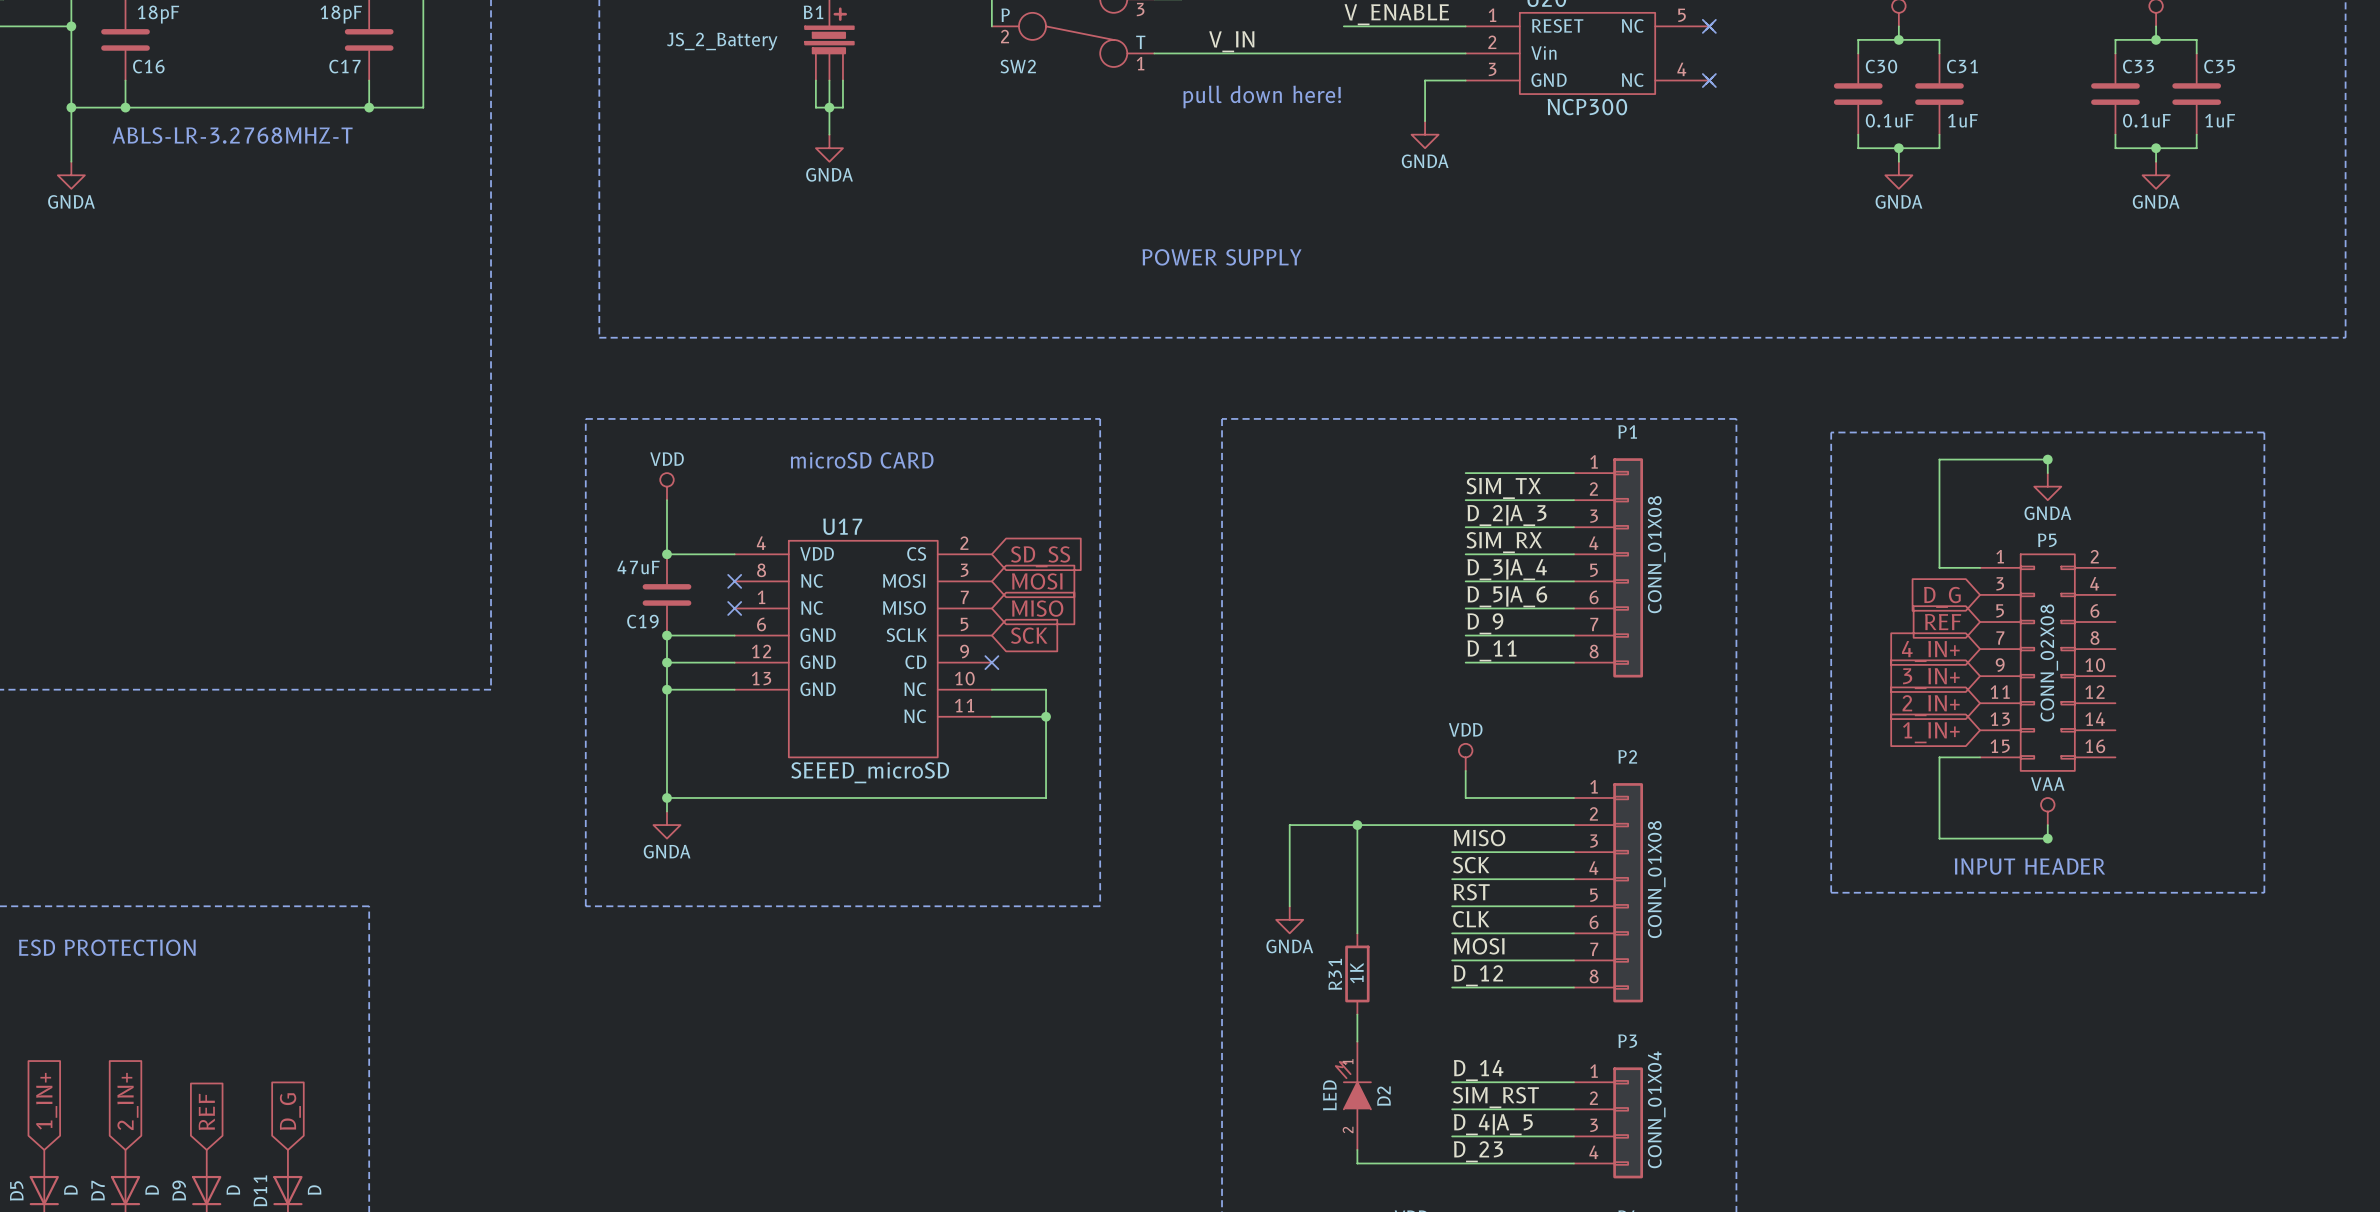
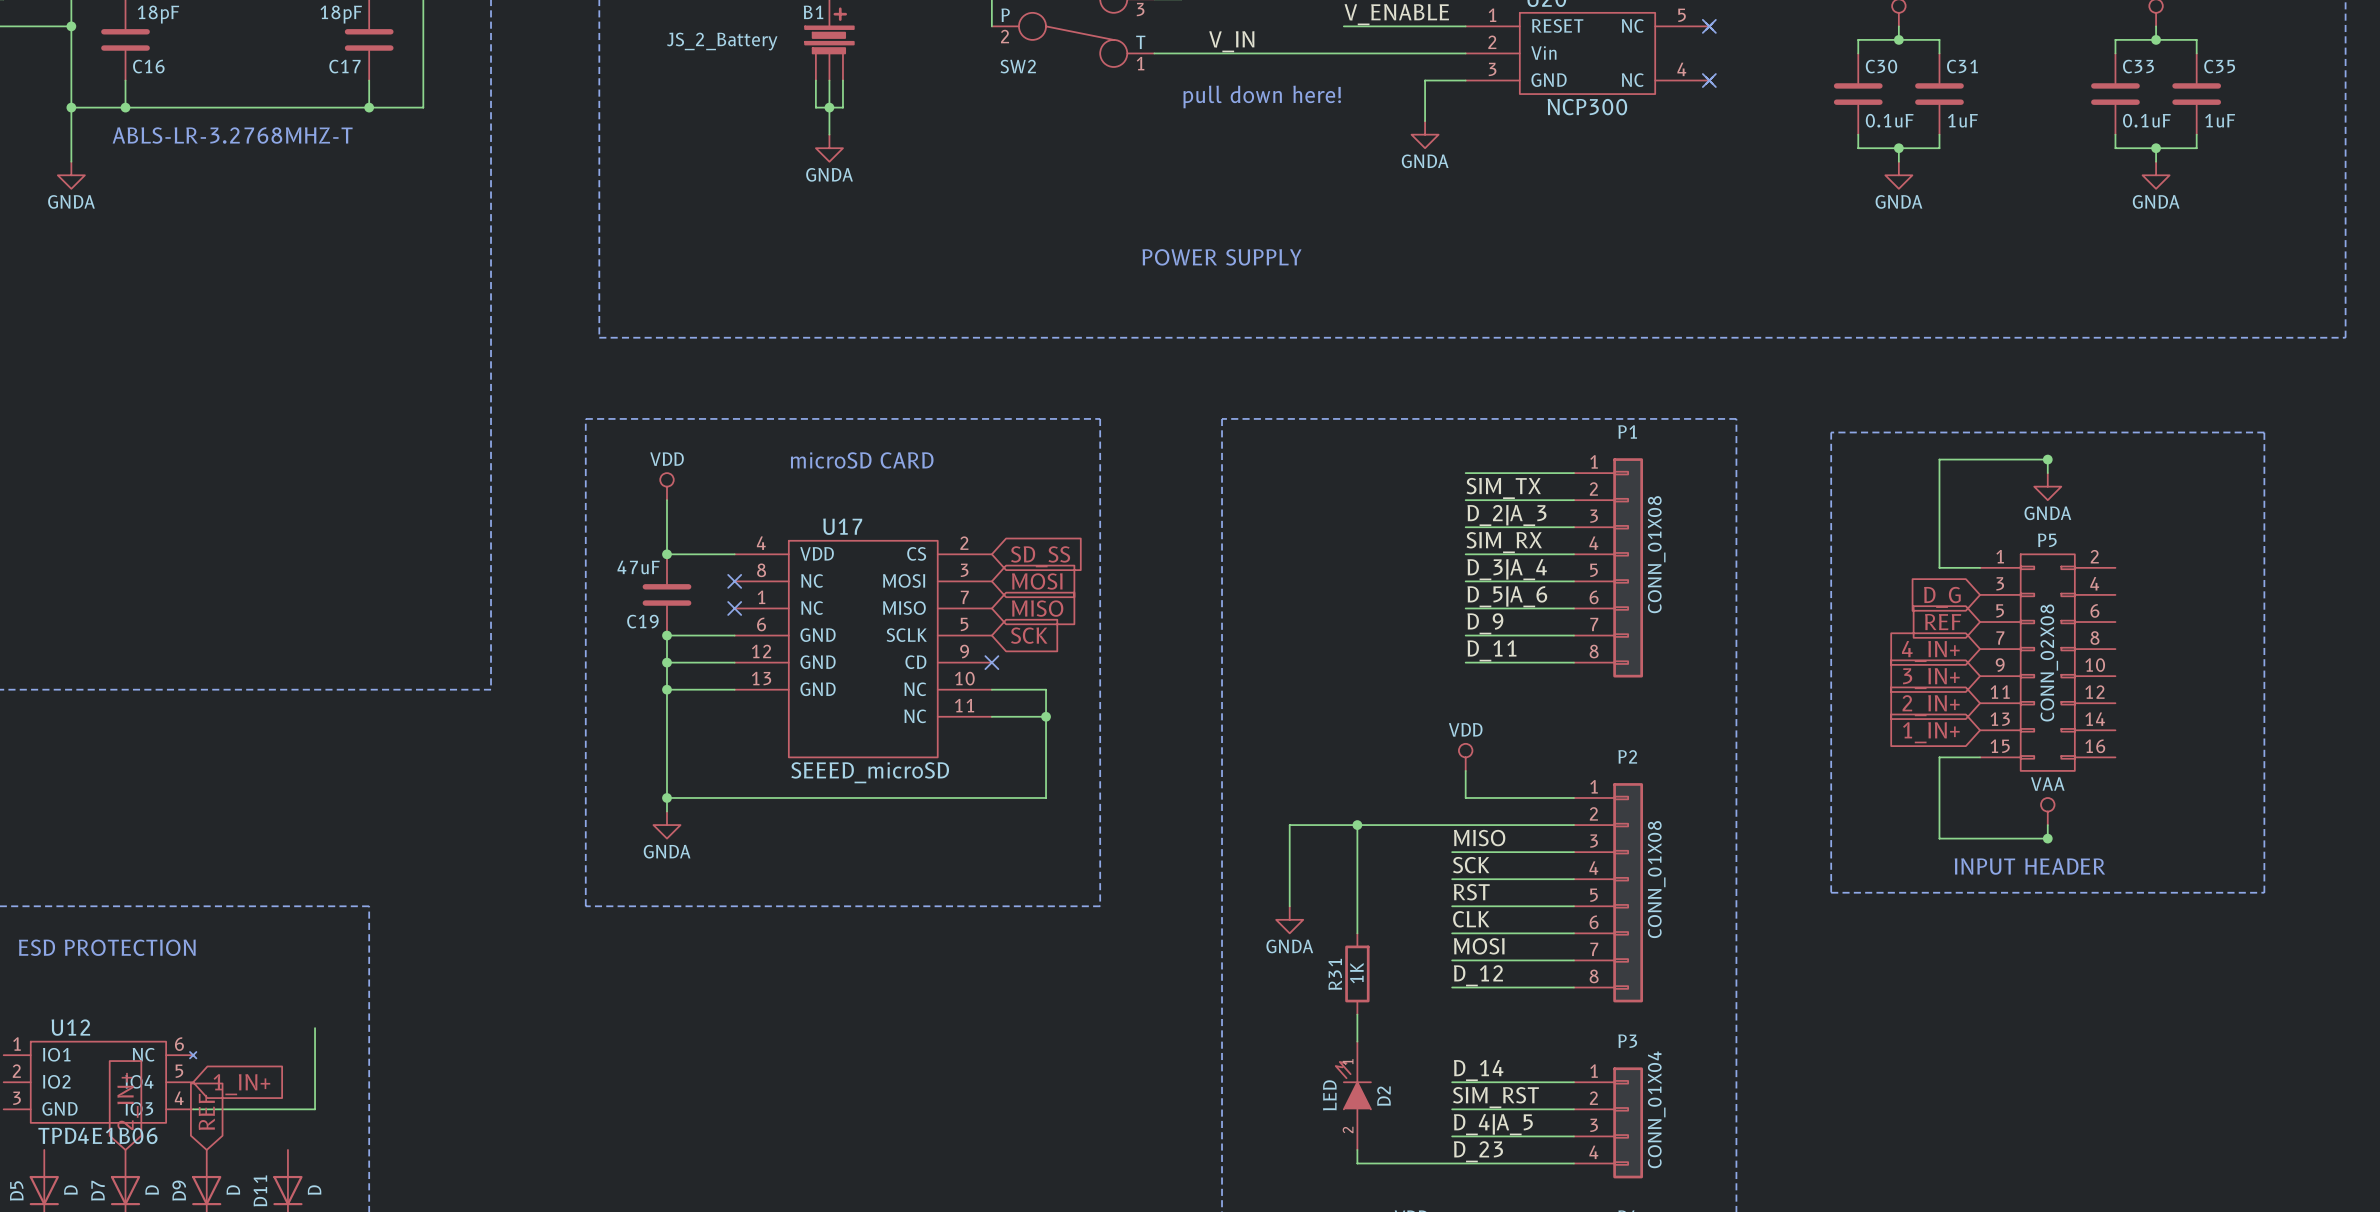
wire: none -> (315, 1028) (315, 1109) (193, 1109)
U12: none -> TPD4E1B06 (100, 1082)
global label rotation: 0° (46, 1101) -> 90° clockwise (241, 1084)
global label position: 1_IN+ (46, 1101) -> 1_IN+ (241, 1084)
global label: D_G (290, 1111) -> none

